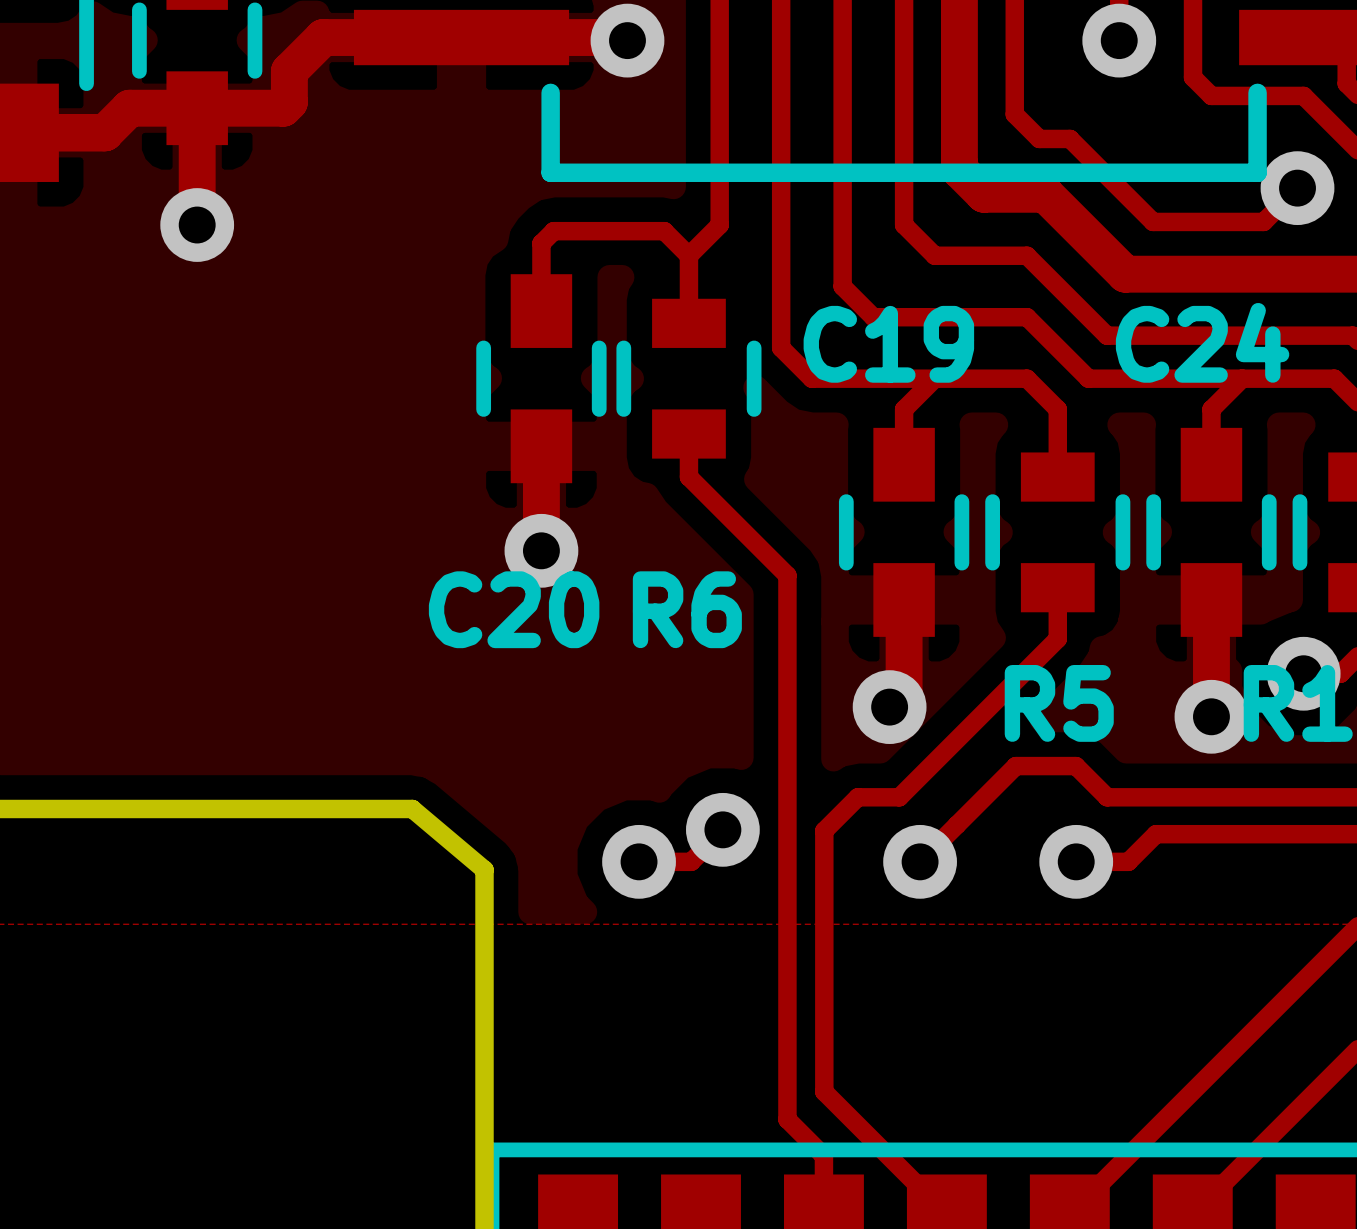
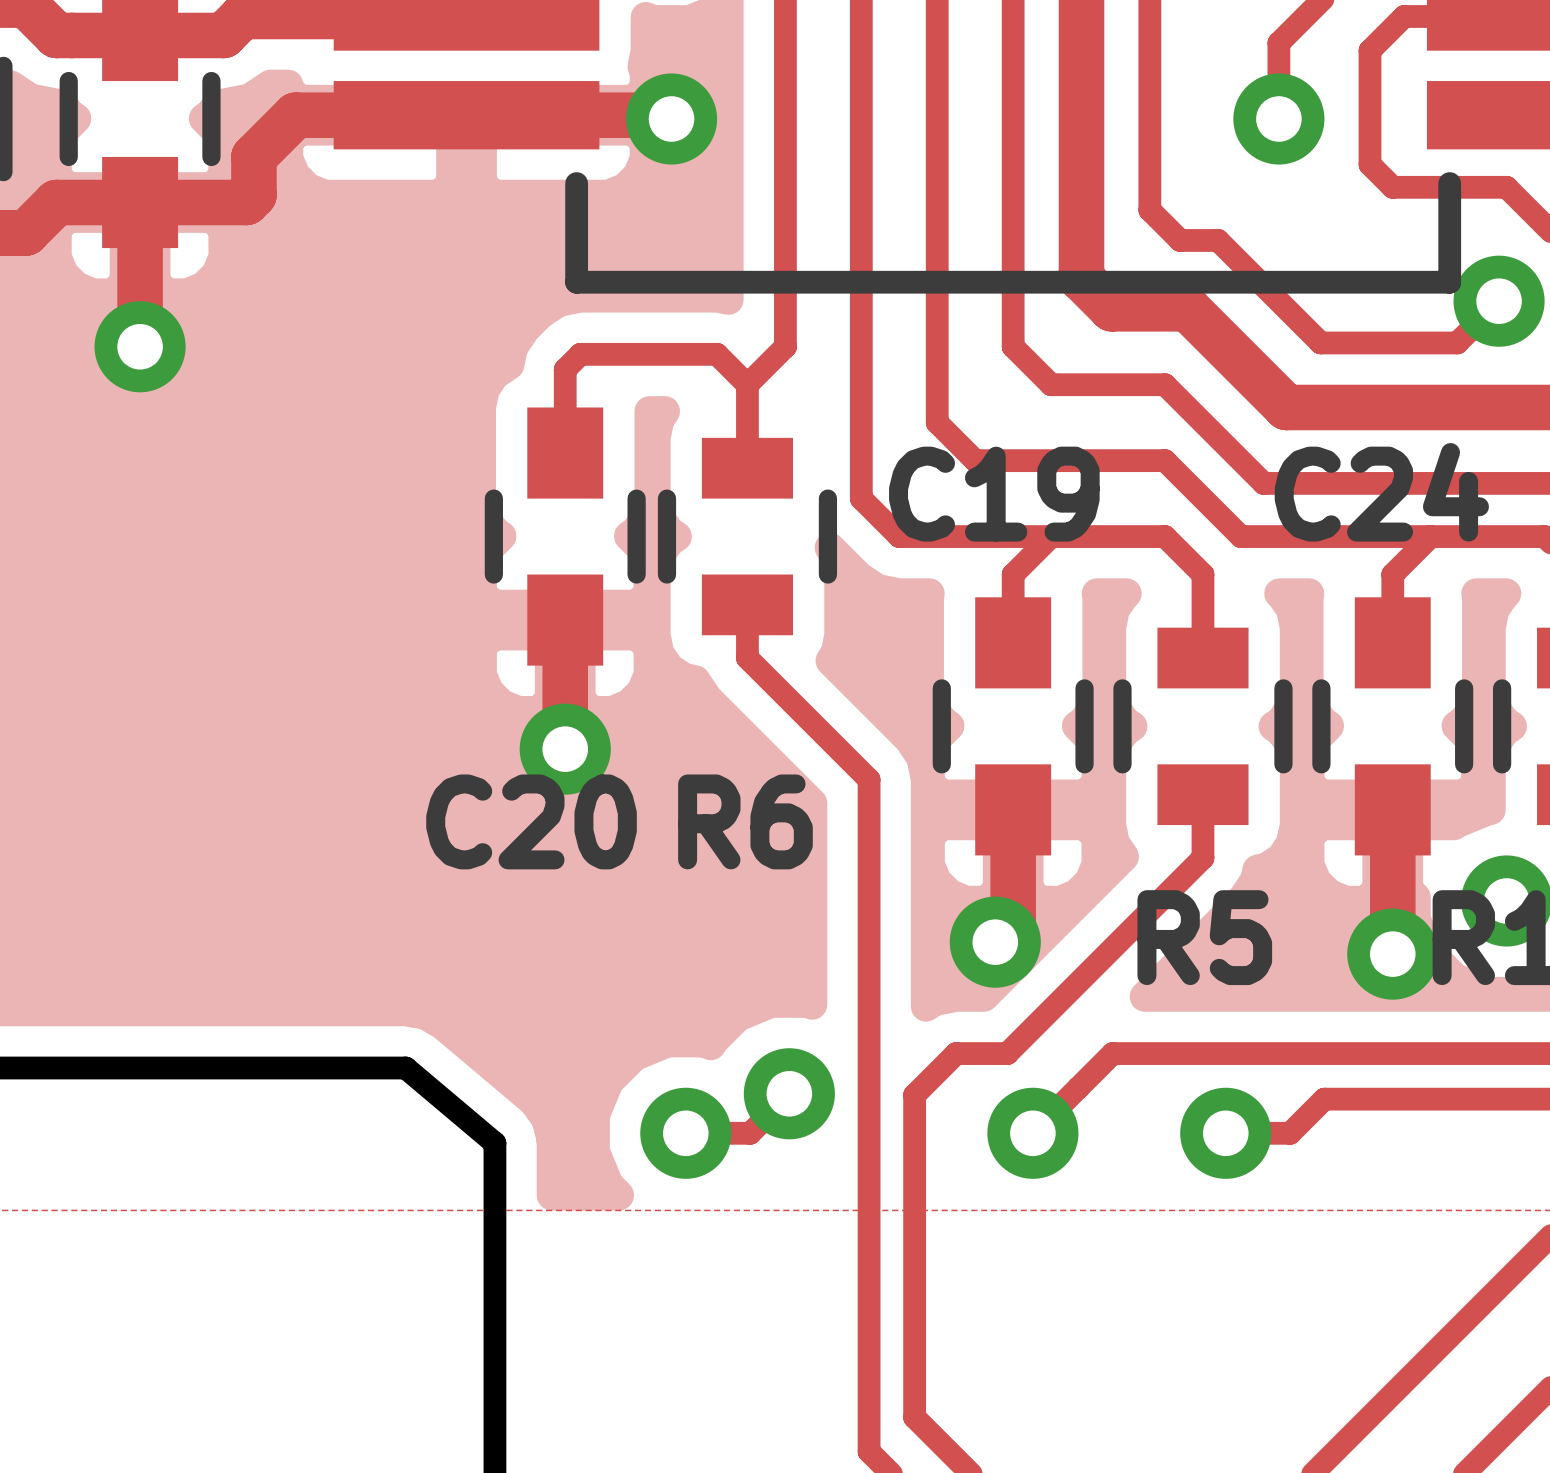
track: (984, 797) (1015, 766) (1075, 766) (1107, 797) -> (1112, 1053) (1264, 1053)

